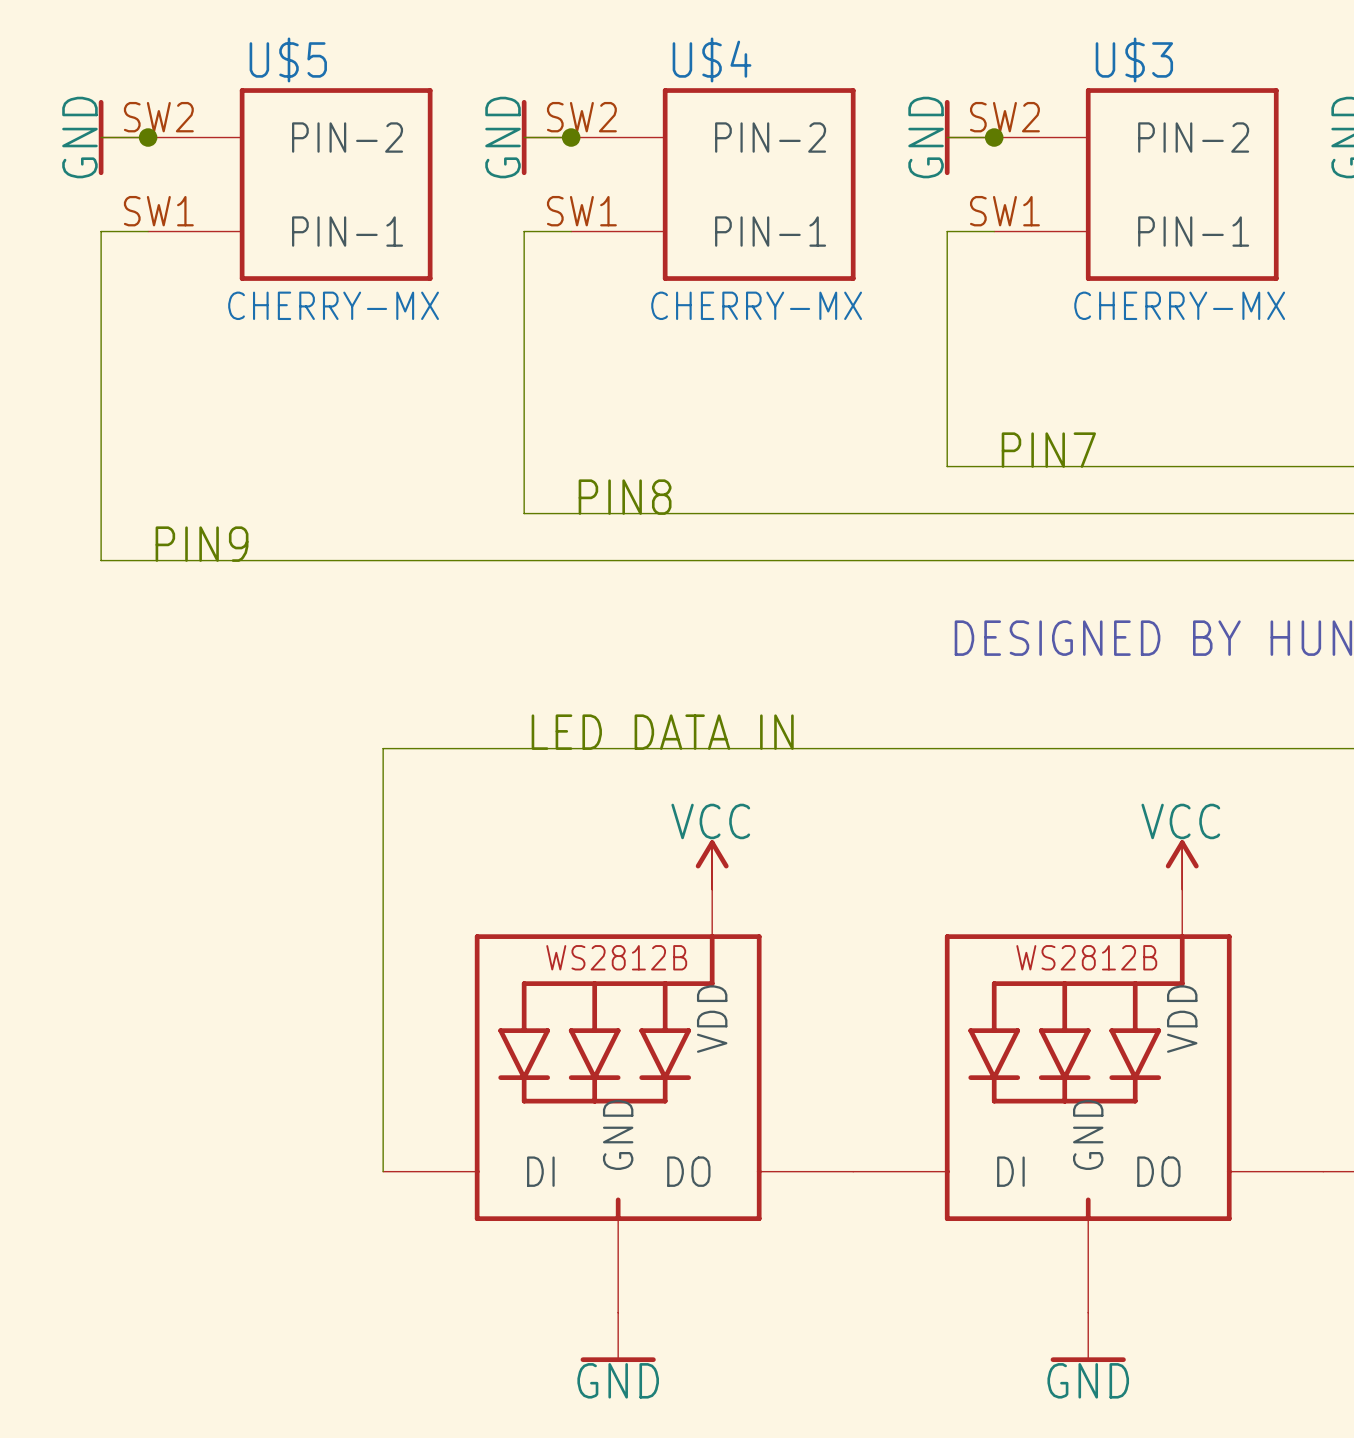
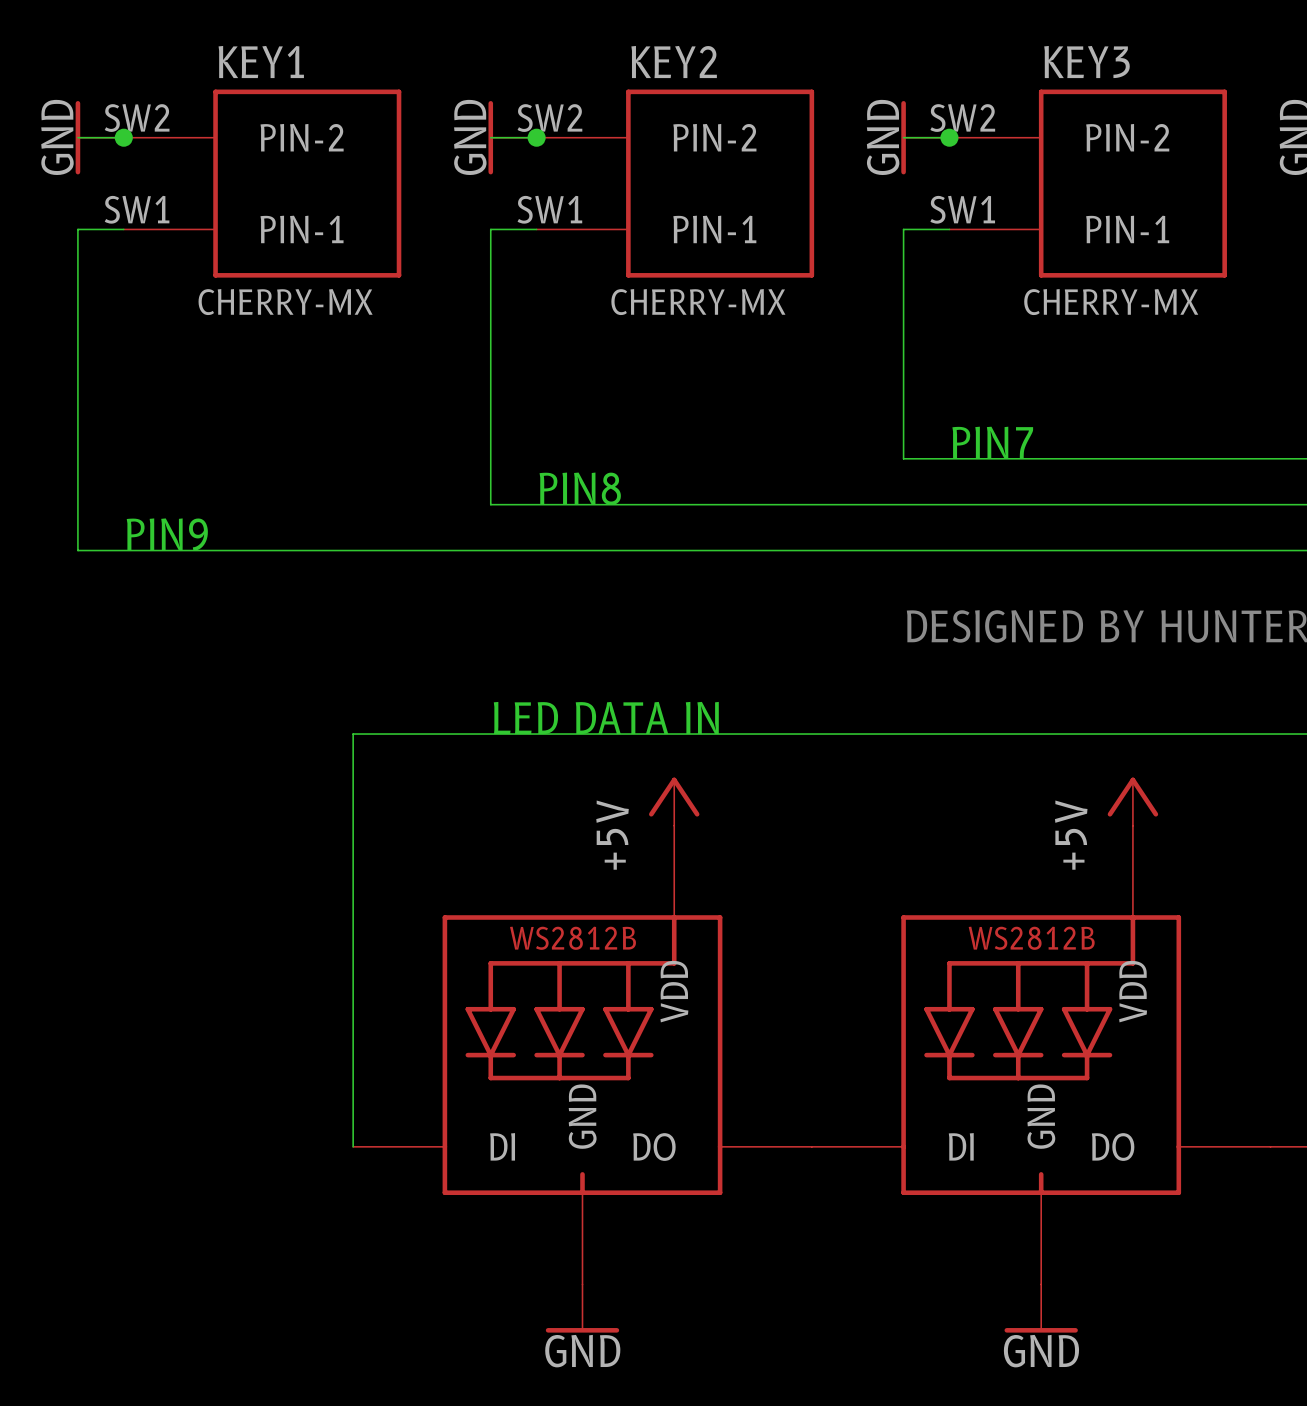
U$5 name: U$5 (288, 59) -> KEY1 (261, 62)
U$4 name: U$4 (712, 59) -> KEY2 (674, 62)
U$3 name: U$3 (1134, 59) -> KEY3 (1086, 62)
power symbol: none -> +5V (674, 801)
power symbol: none -> +5V (1132, 801)
power symbol: VCC (712, 864) -> none
power symbol: VCC (1182, 864) -> none

